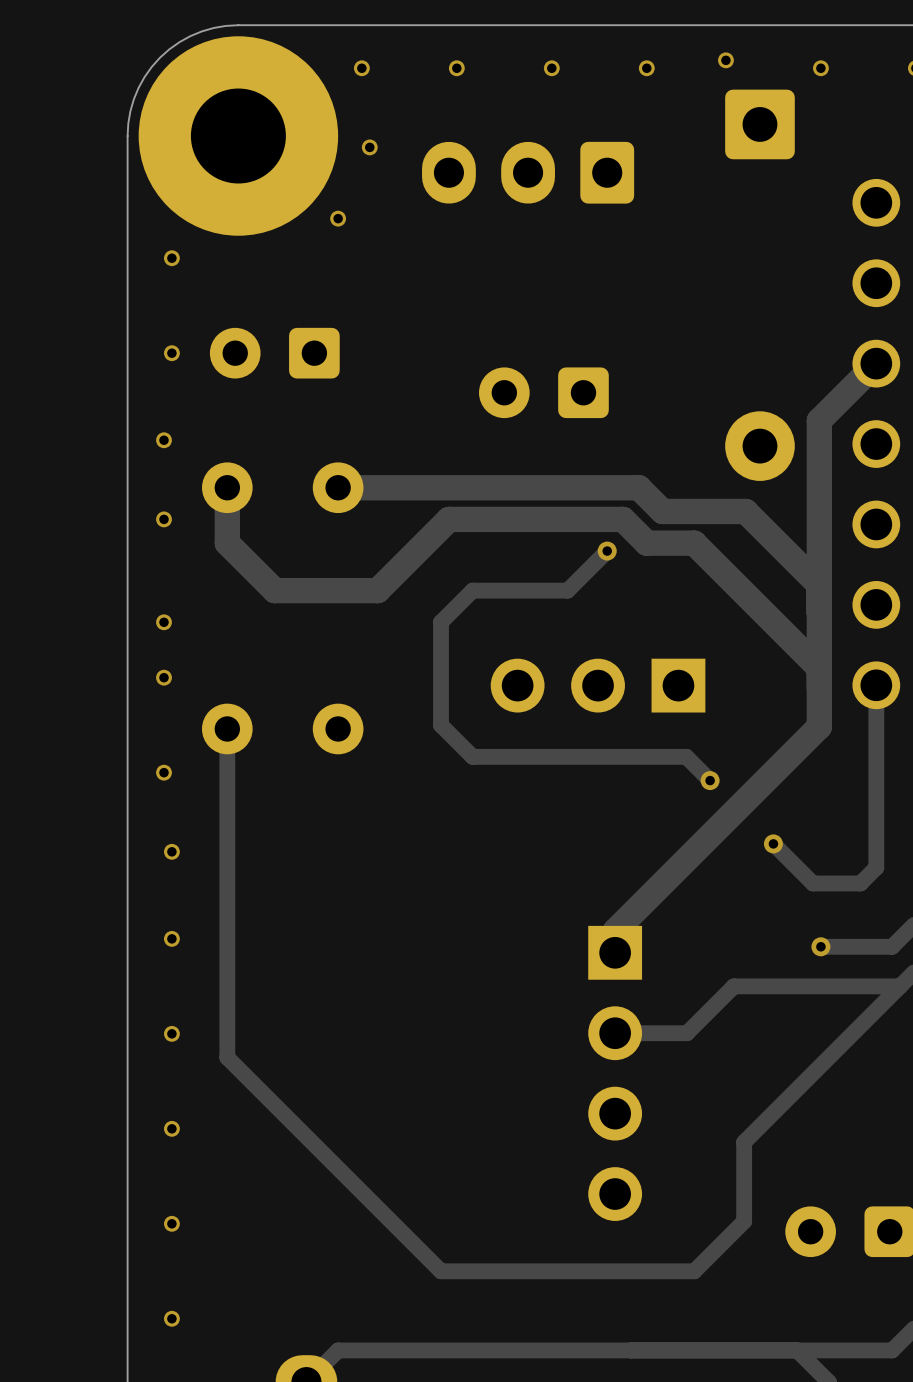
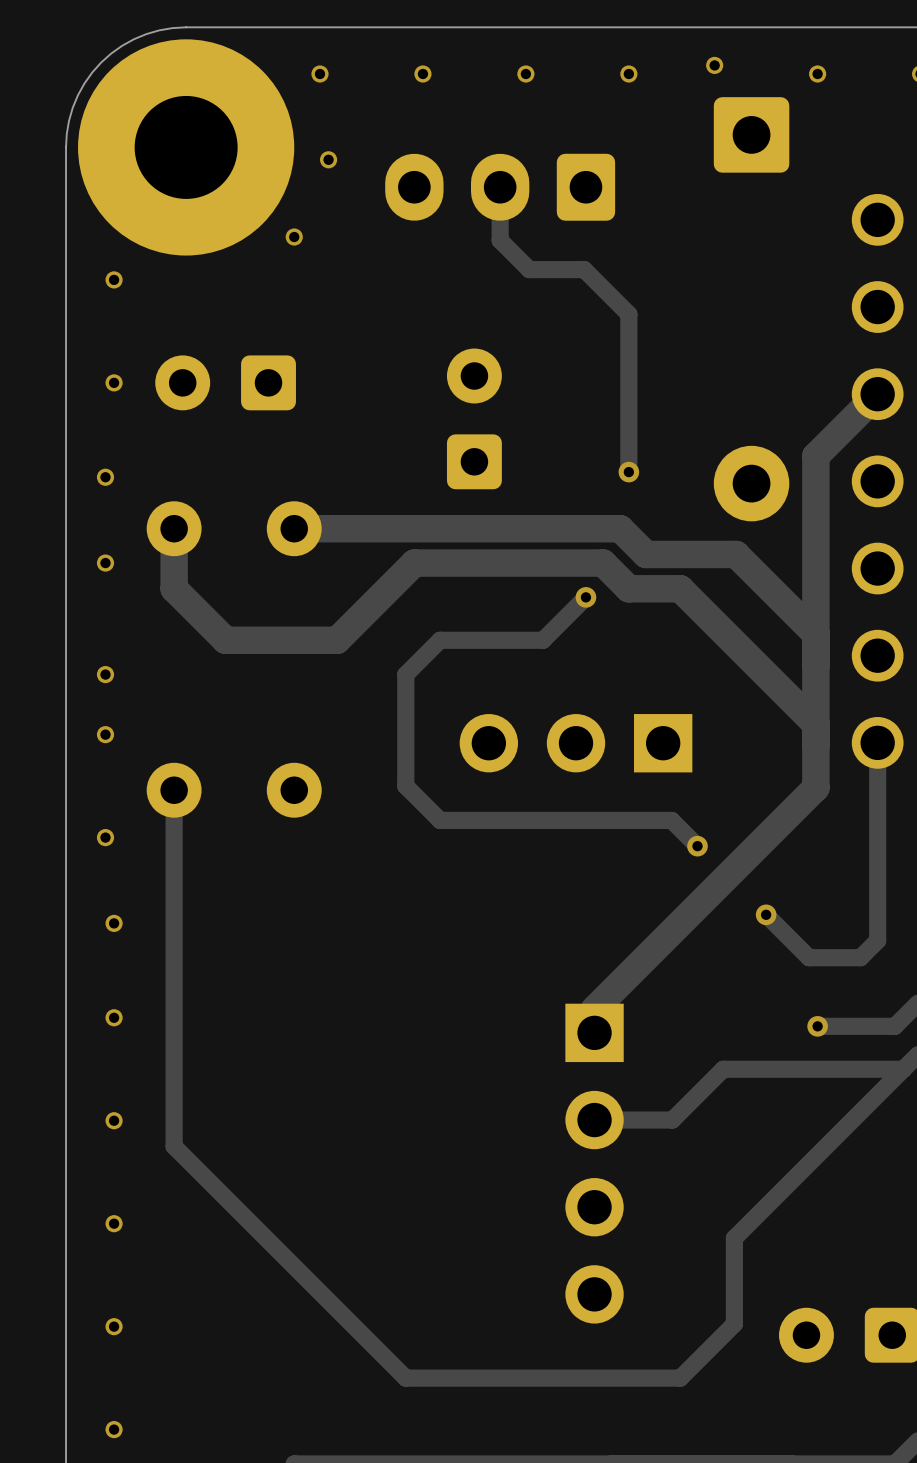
track: none -> (500, 187) (500, 240) (529, 269) (584, 269) (628, 314) (628, 472)
part rotation: 0° (543, 392) -> 90° clockwise (474, 418)
via: none -> (628, 472)

